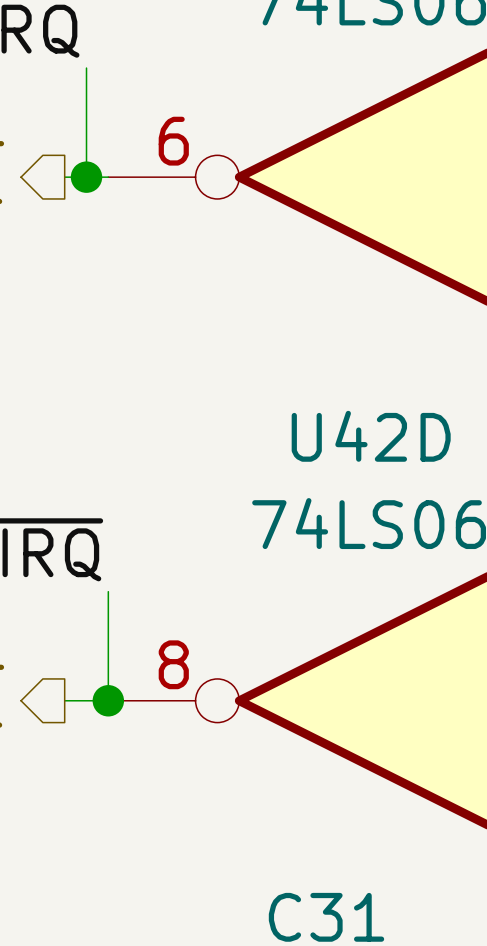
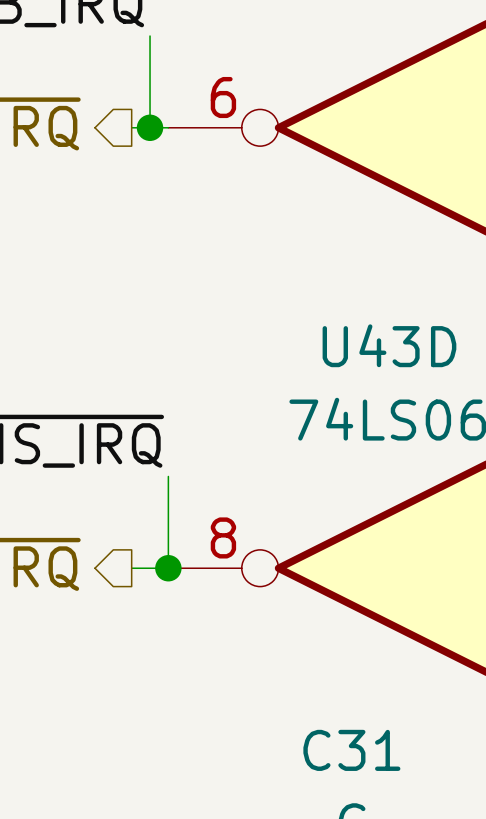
U42D name: U42D (371, 436) -> U43D (389, 345)

